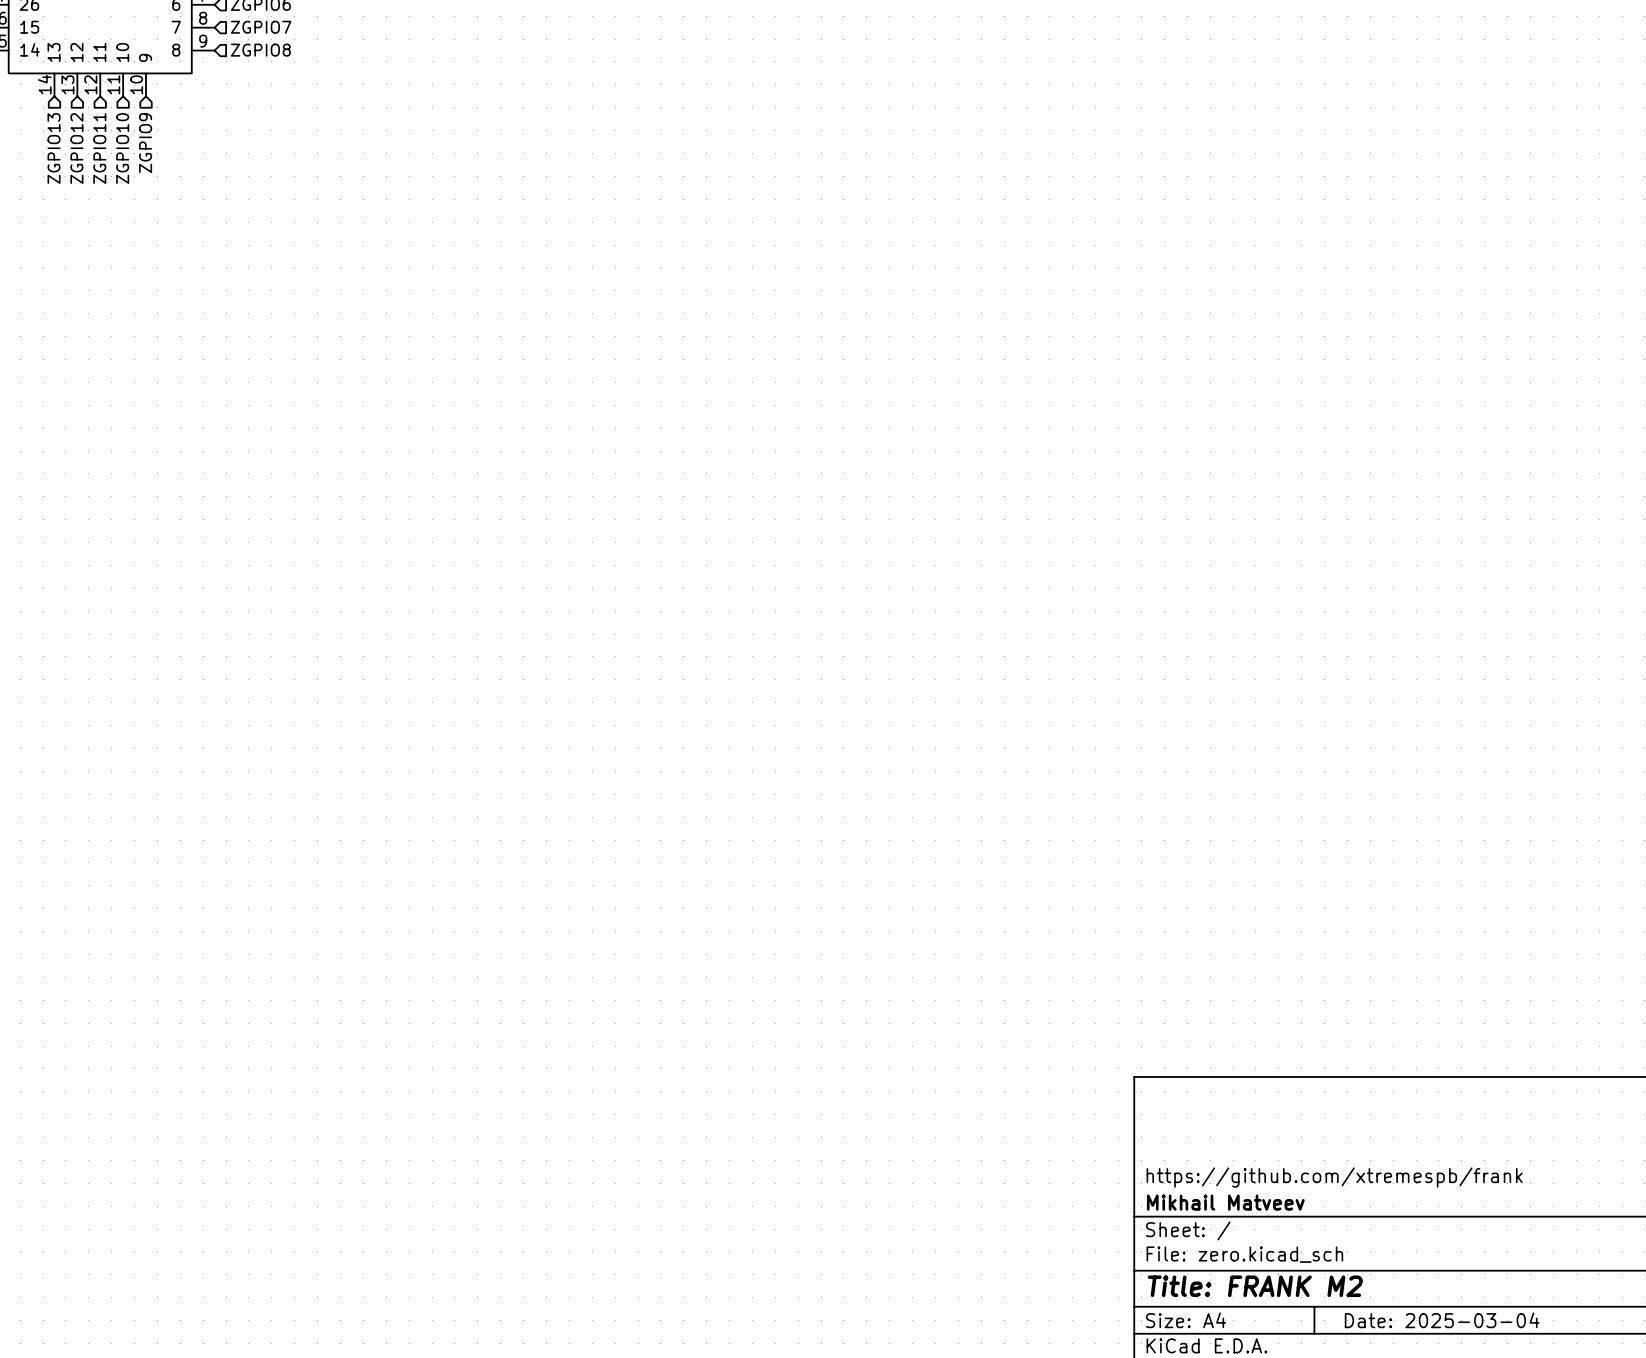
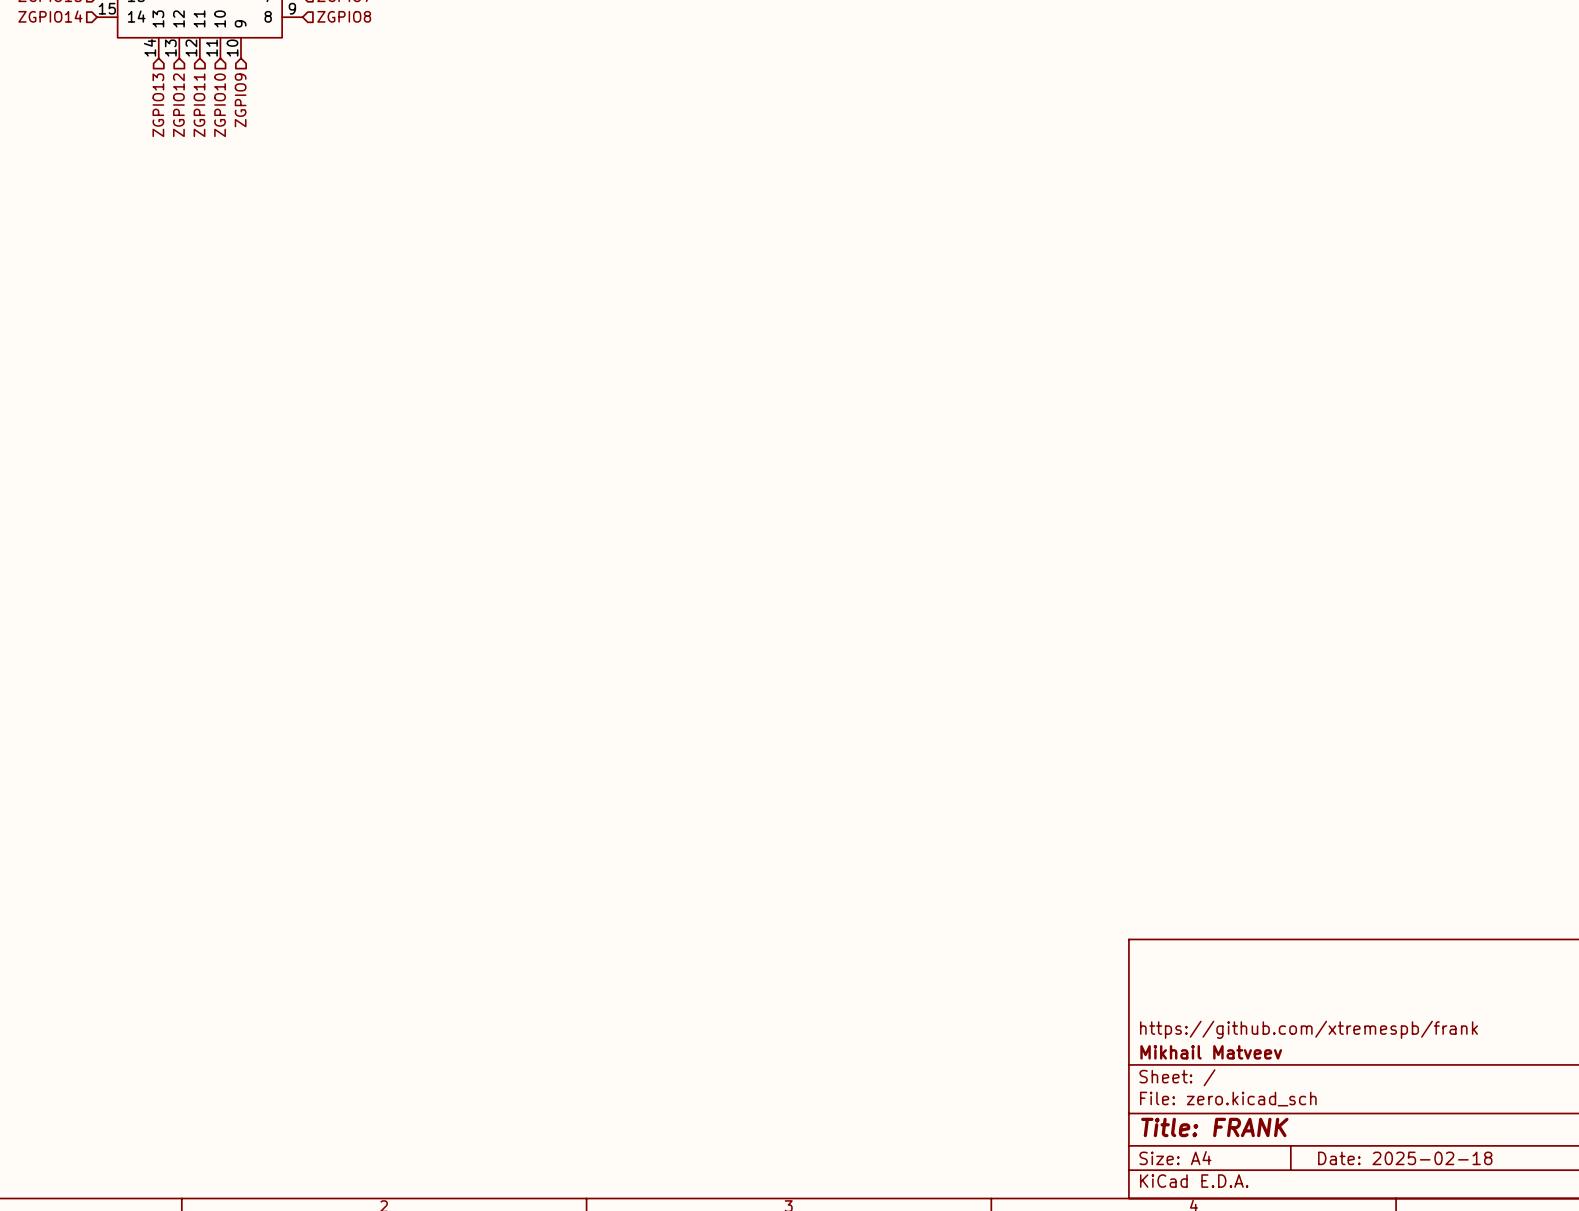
title block: Title: FRANK M2 (1255, 1286) -> Title: FRANK (1214, 1127)
title block: Date: 2025-03-04 (1442, 1320) -> Date: 2025-02-18 (1405, 1158)

